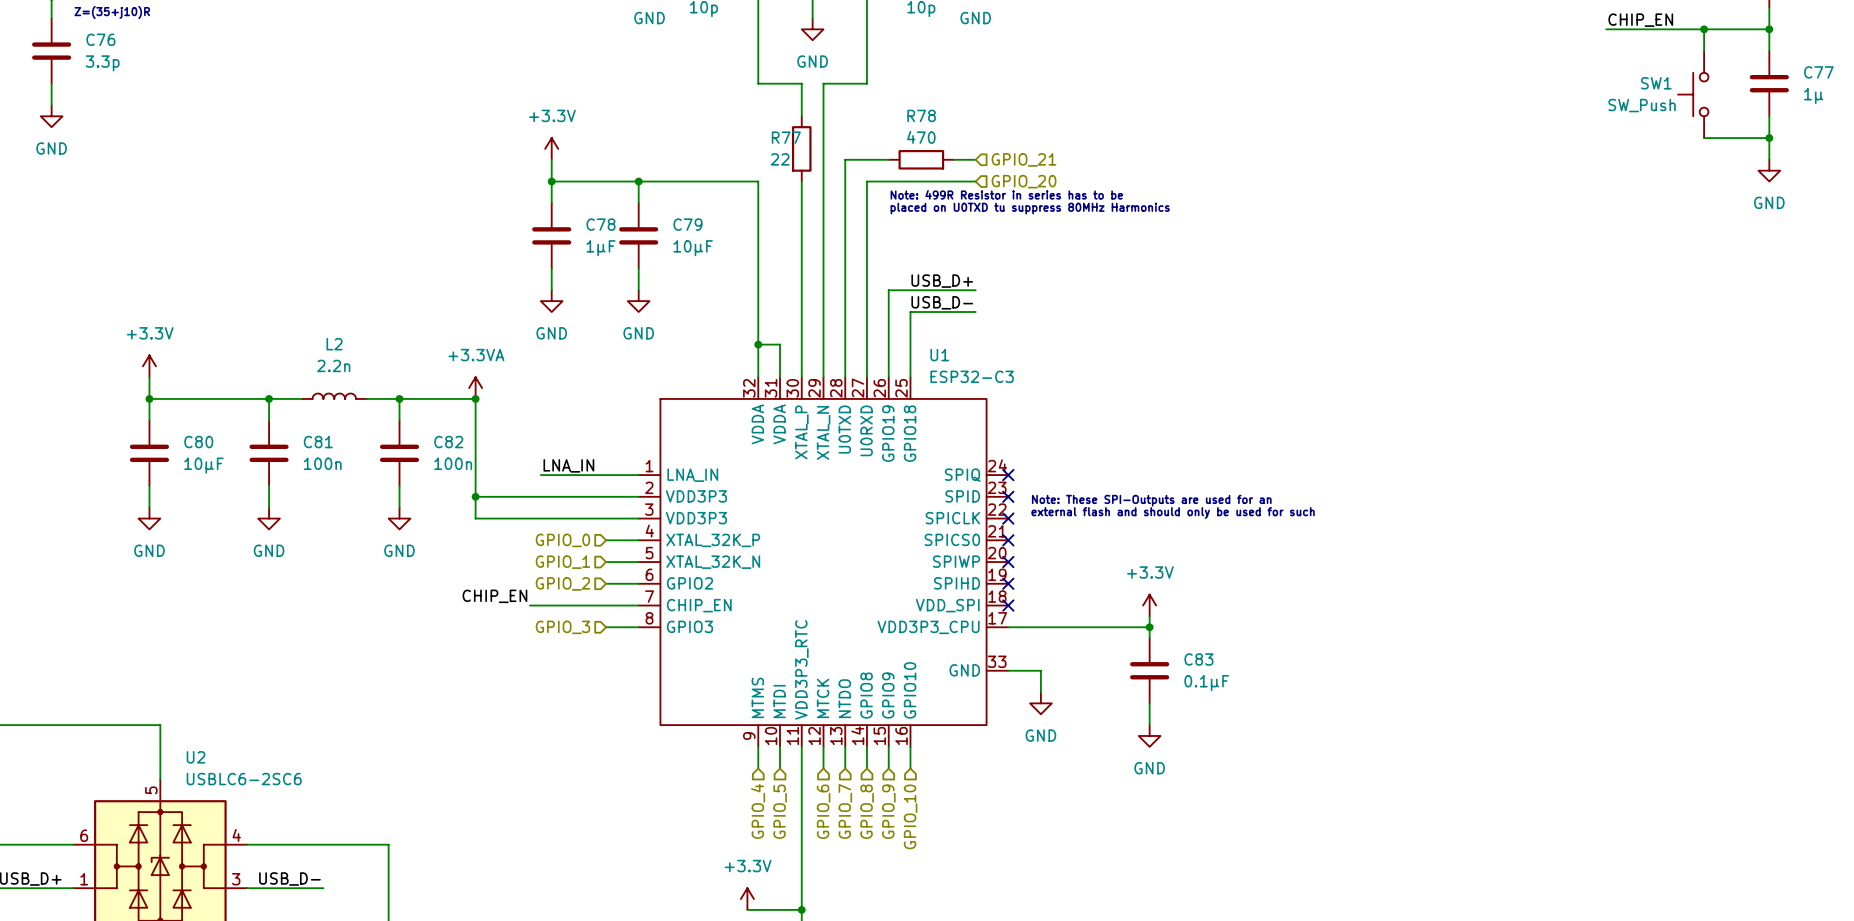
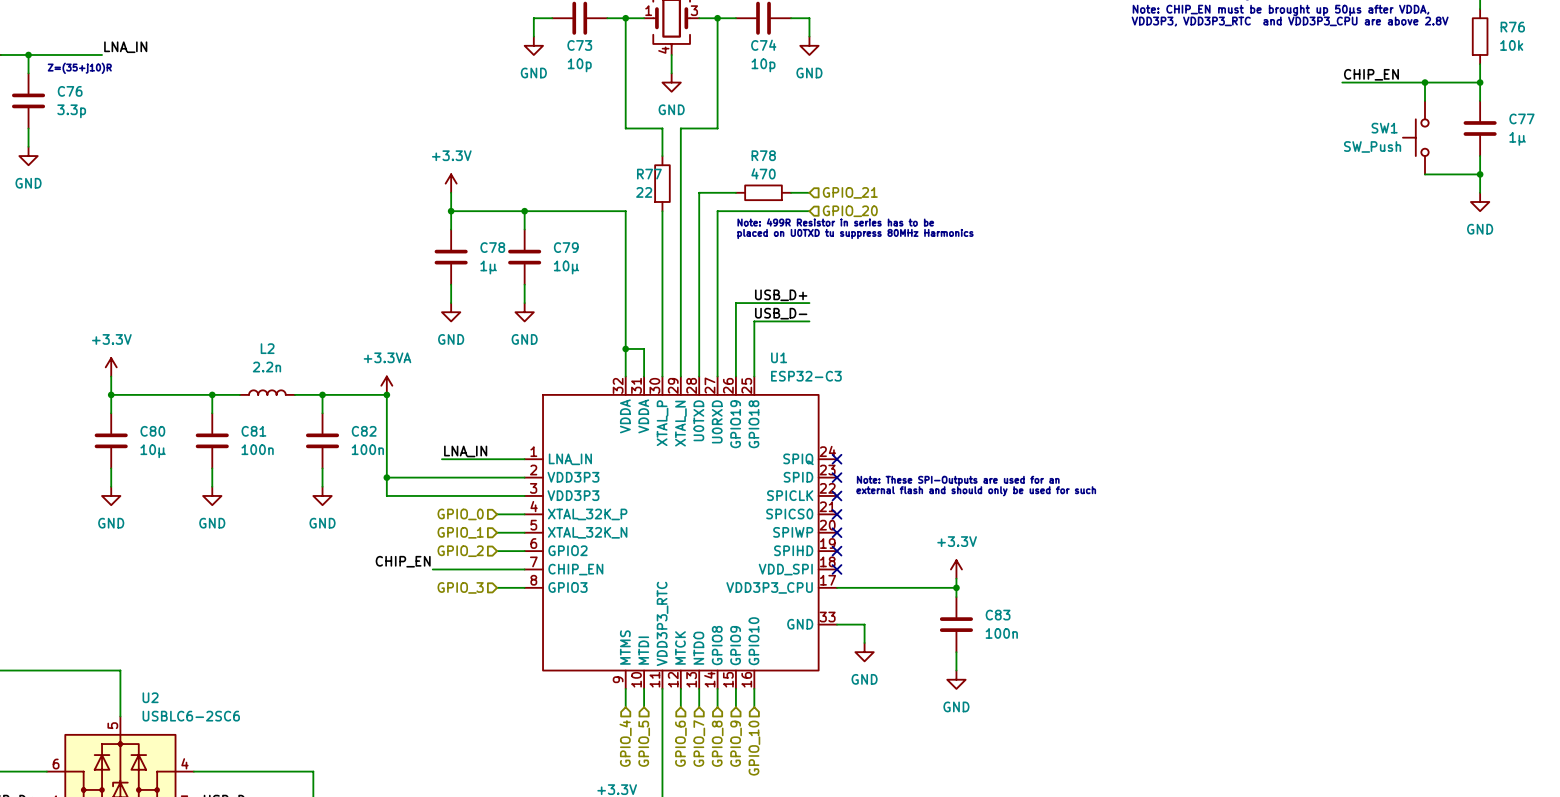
C78 value: 1µF (600, 248) -> 1µ (488, 267)
C79 value: 10µF (693, 248) -> 10µ (566, 267)
C80 value: 10µF (203, 465) -> 10µ (153, 451)
C83 value: 0.1µF (1206, 683) -> 100n (1001, 633)

